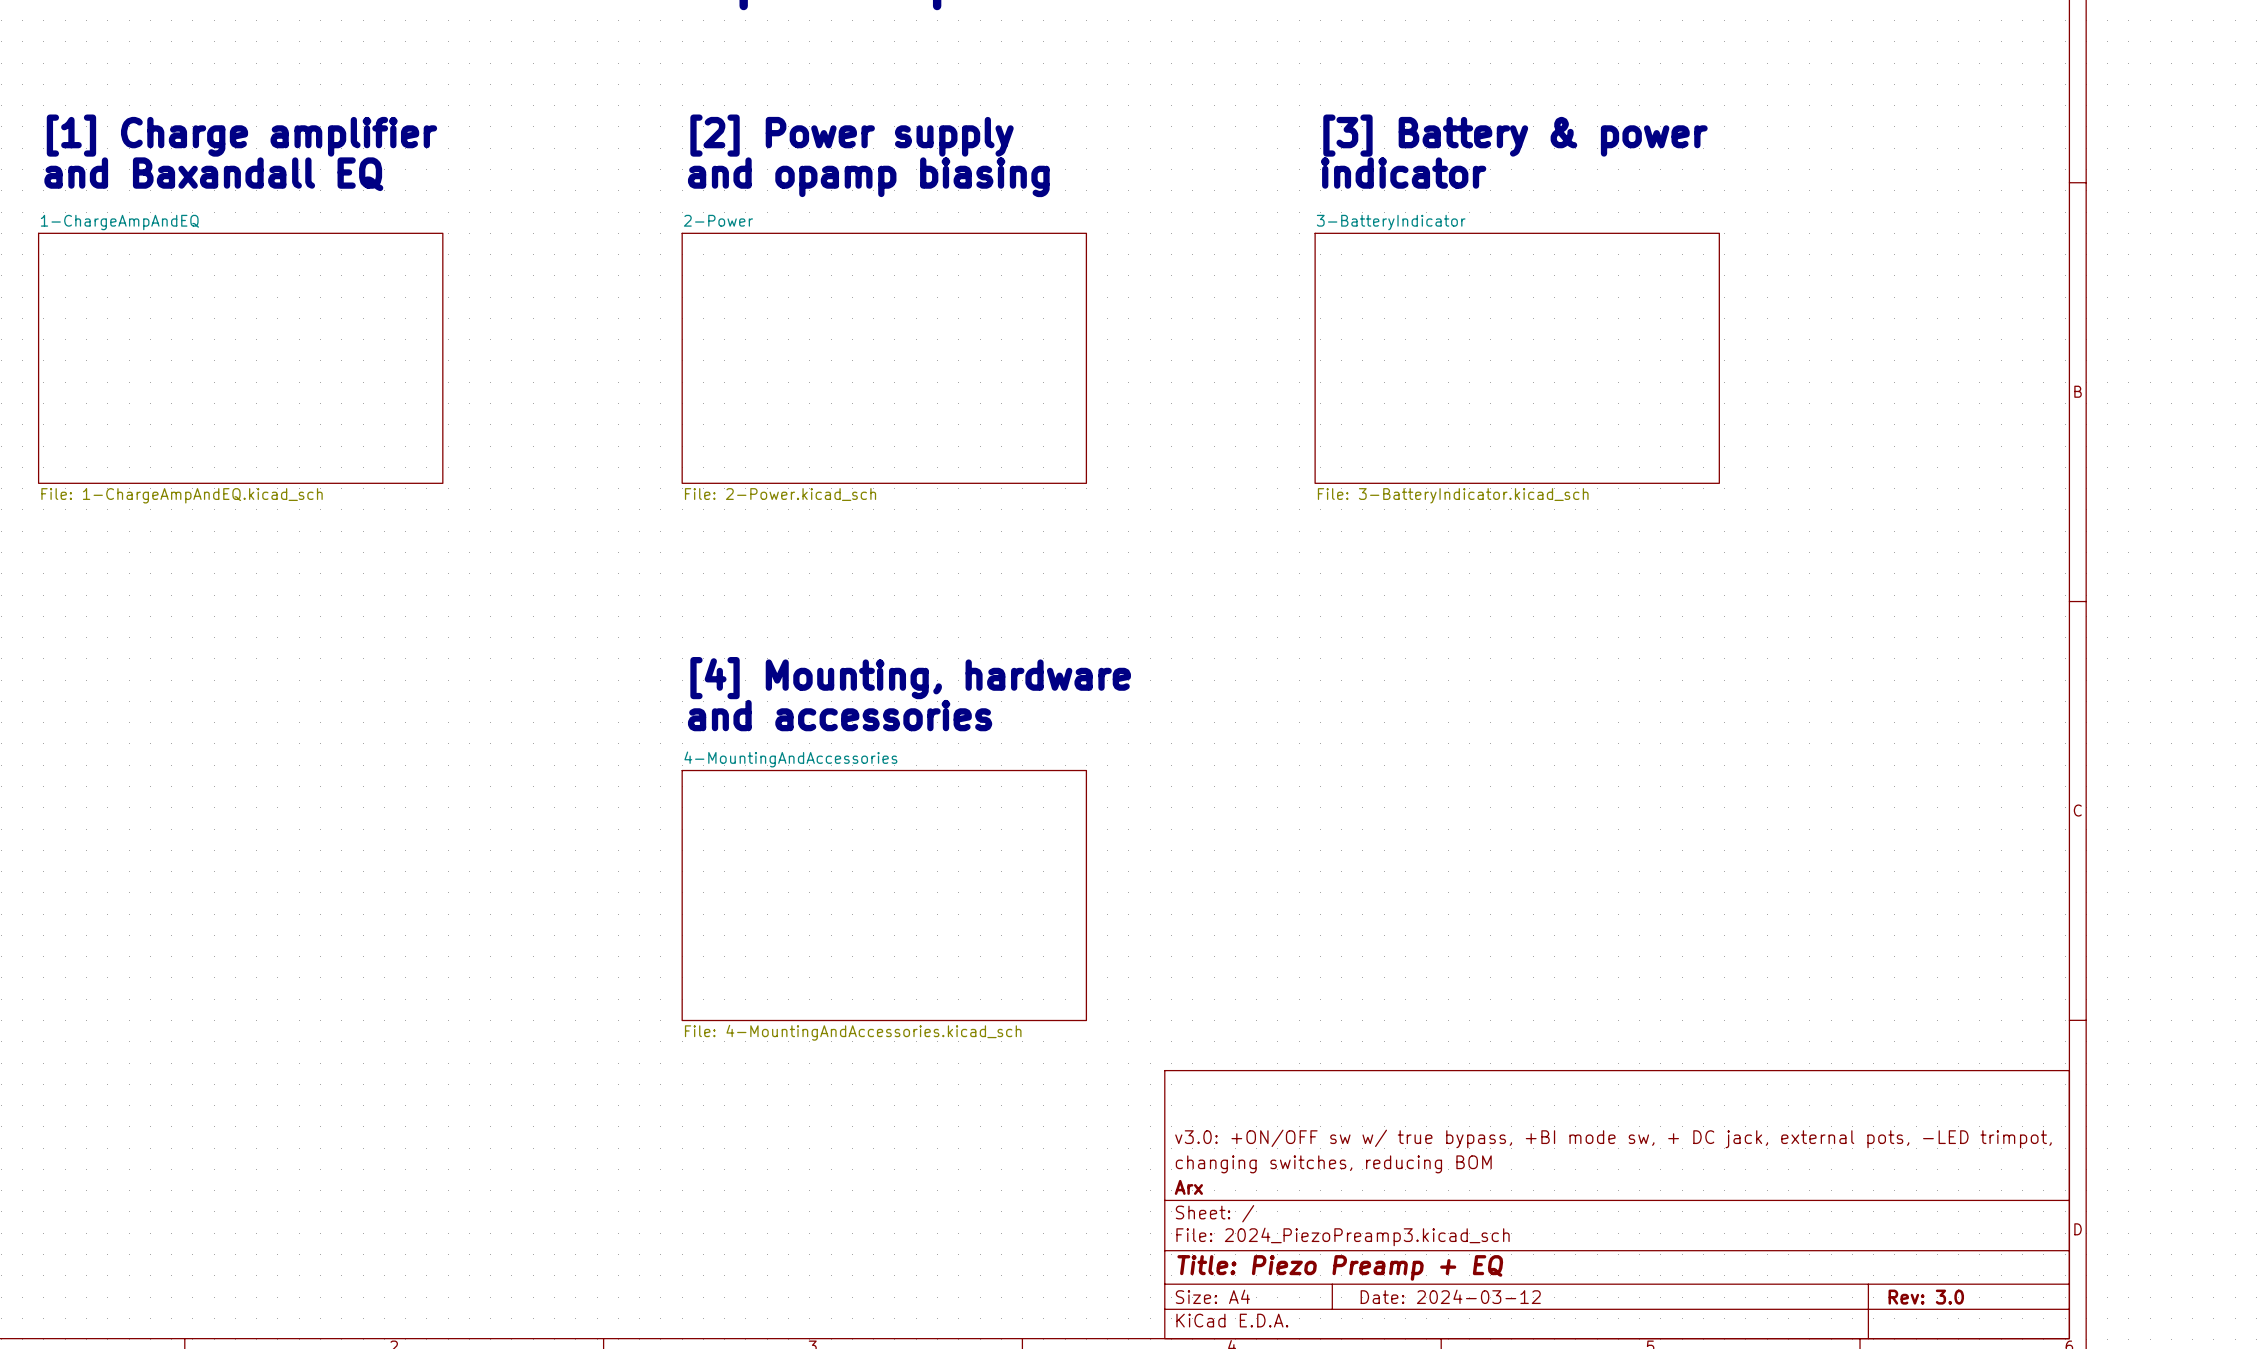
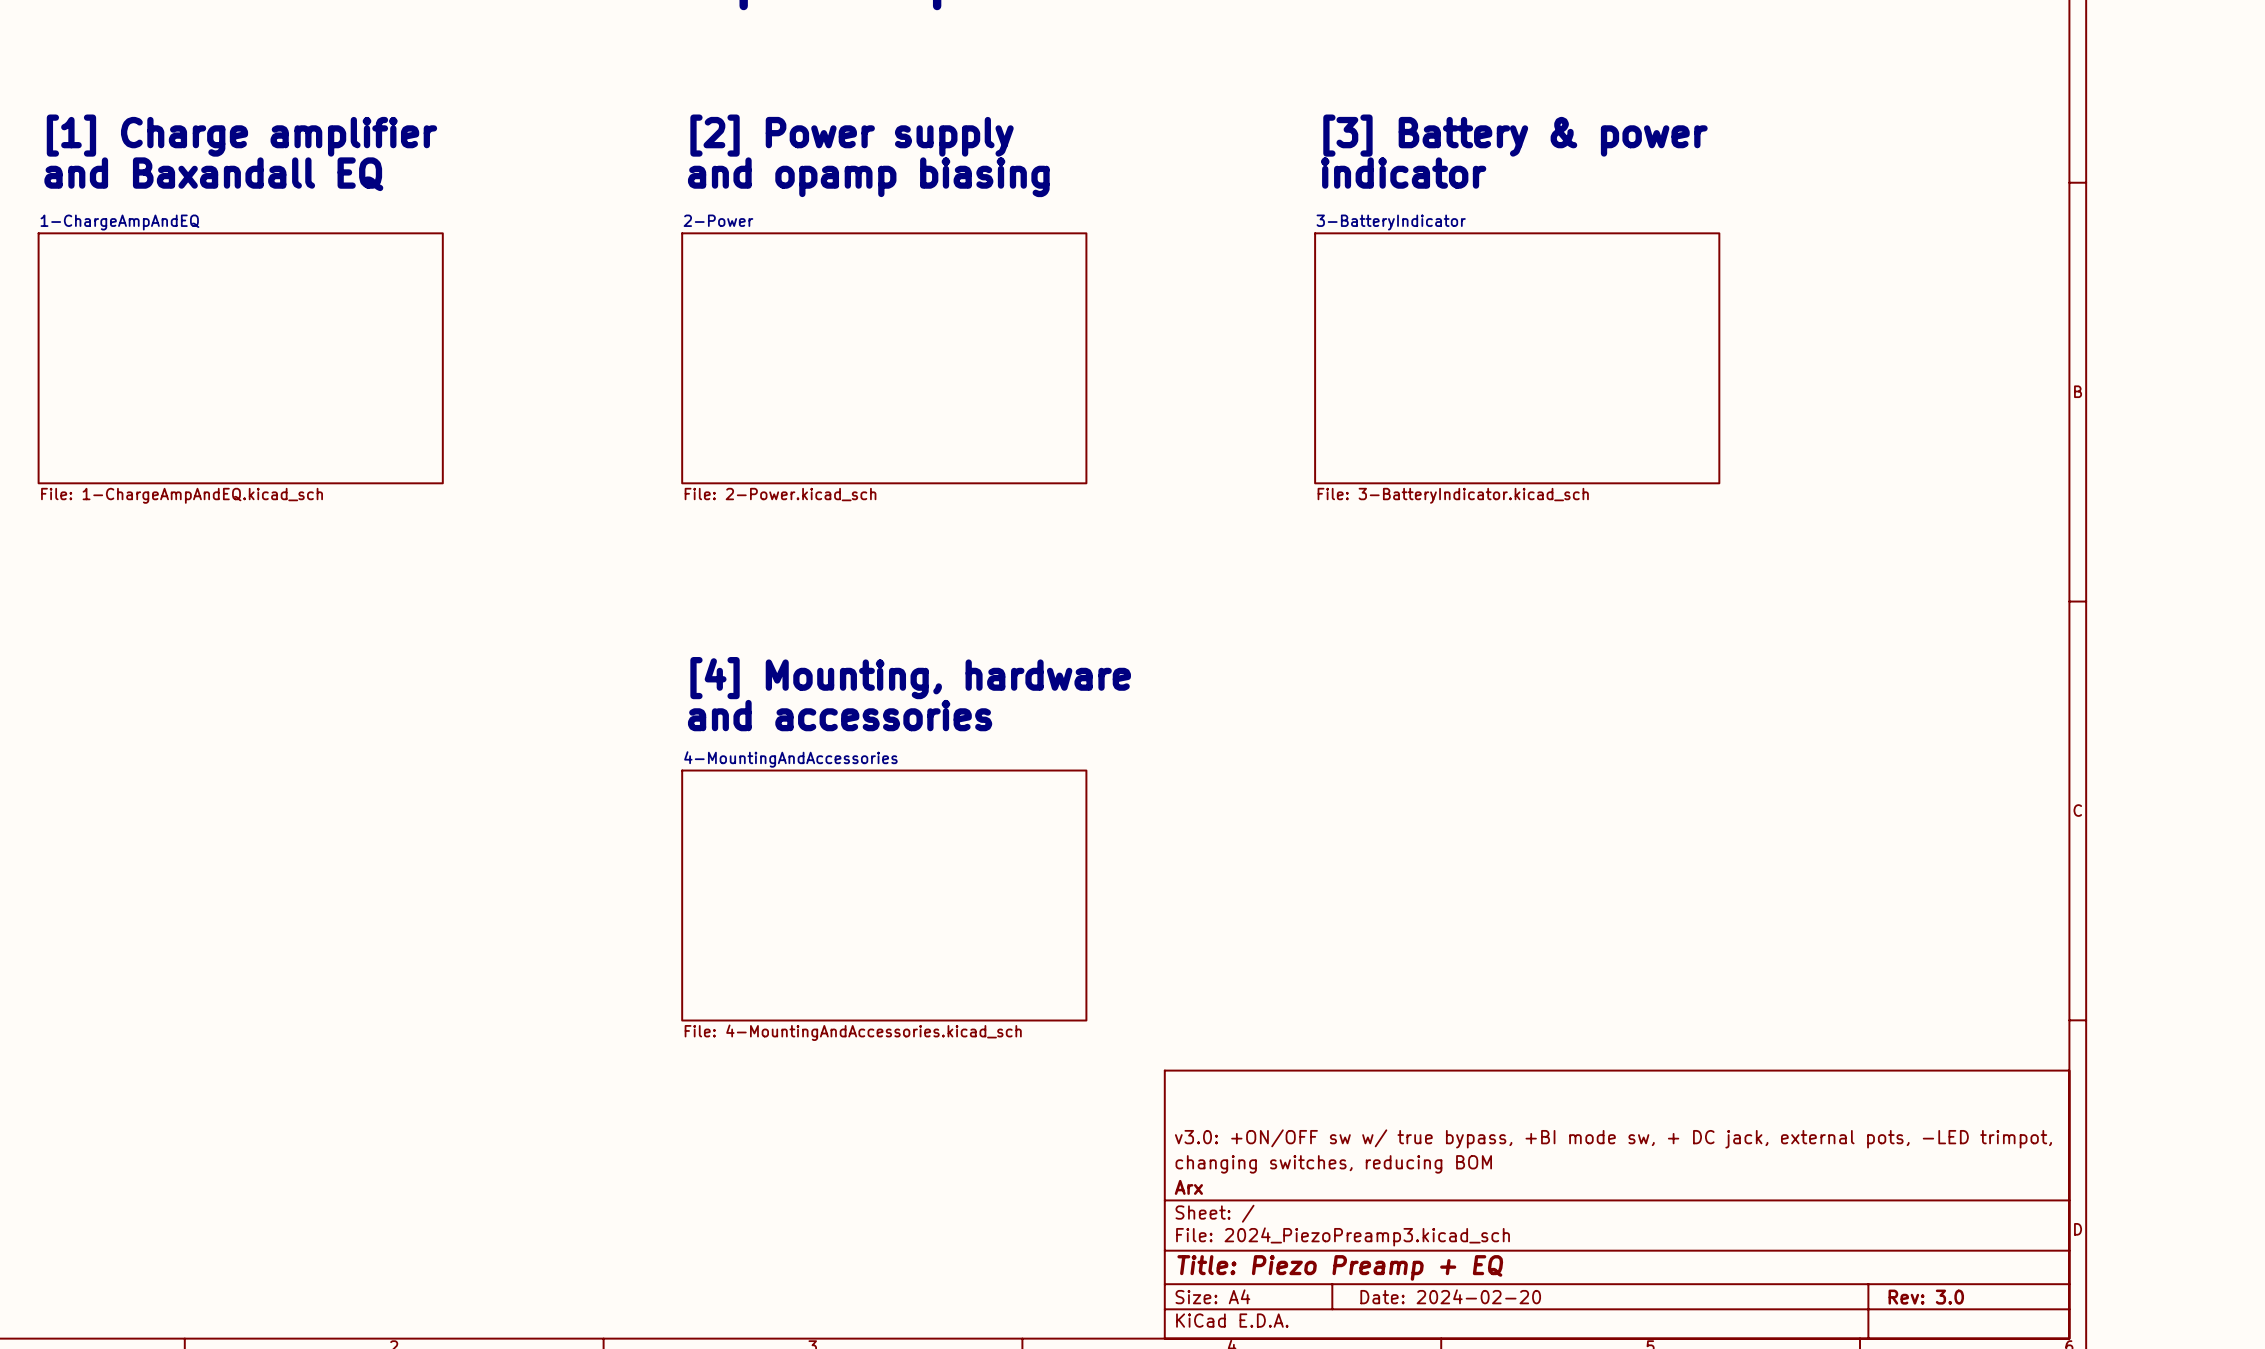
title block: Date: 2024-03-12 (1450, 1296) -> Date: 2024-02-20 (1450, 1296)

